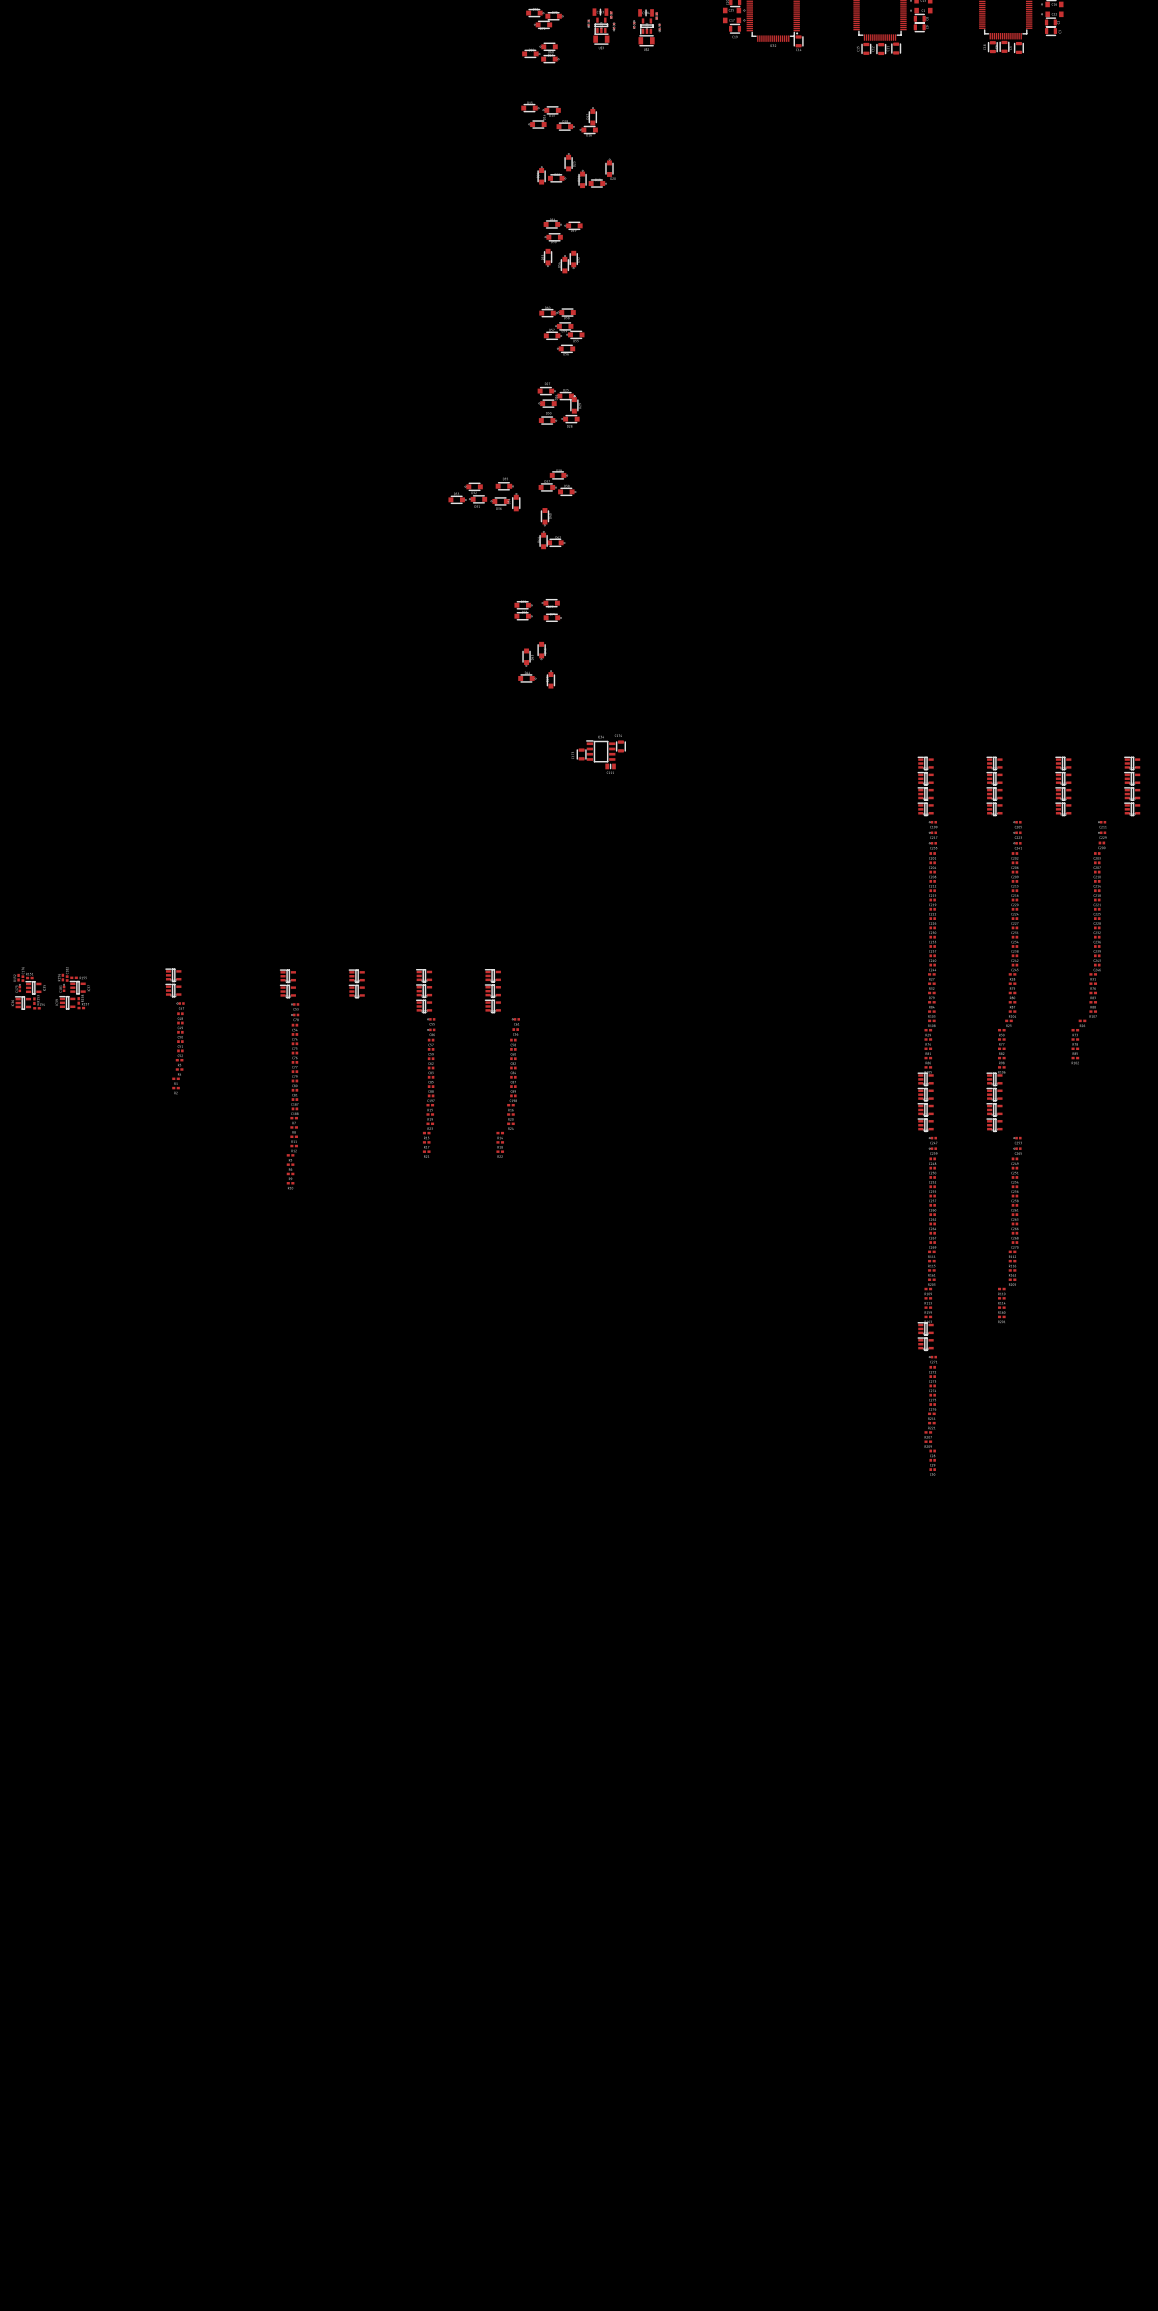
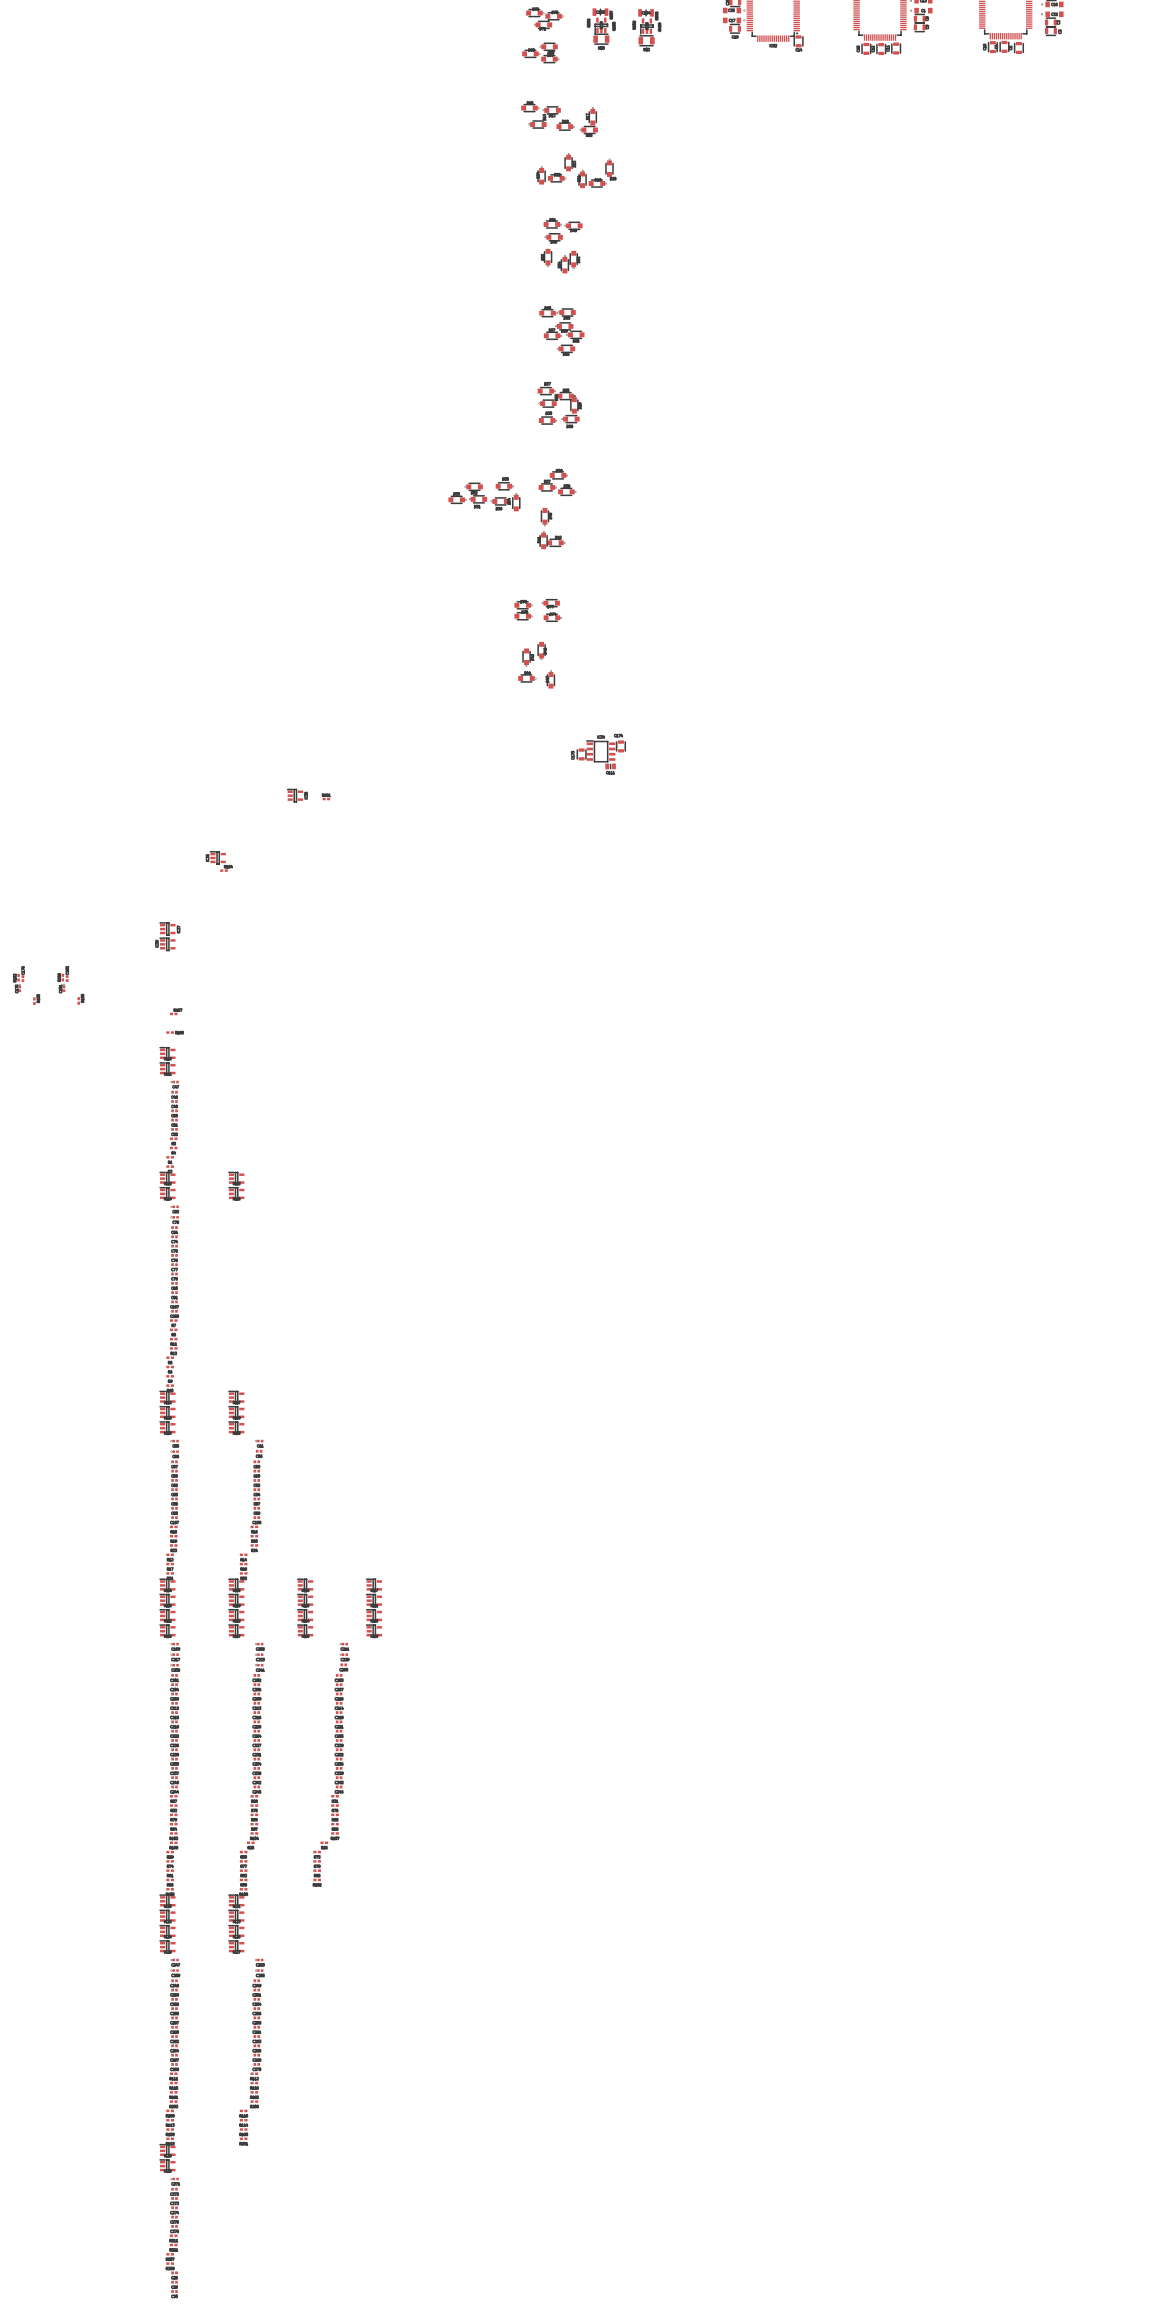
part position: (925, 763) -> (167, 1585)
part position: (994, 763) -> (236, 1585)
part position: (1063, 763) -> (305, 1585)
part position: (1132, 763) -> (374, 1585)
part position: (925, 778) -> (167, 1600)
part position: (994, 778) -> (236, 1600)
part position: (1063, 778) -> (305, 1600)
part position: (1132, 778) -> (374, 1600)
part position: (925, 794) -> (167, 1615)
part position: (994, 794) -> (236, 1615)
part position: (1063, 794) -> (305, 1615)
part position: (1132, 794) -> (374, 1615)
part position: (925, 809) -> (167, 1631)
part position: (994, 809) -> (236, 1631)
part position: (1063, 809) -> (305, 1631)
part position: (1132, 809) -> (374, 1631)
part position: (933, 822) -> (174, 1644)
part position: (1017, 822) -> (259, 1644)
part position: (1102, 822) -> (344, 1644)
part position: (933, 832) -> (174, 1654)
part position: (1017, 832) -> (259, 1654)
part position: (1102, 832) -> (344, 1654)
part position: (1101, 842) -> (343, 1664)
part position: (933, 843) -> (174, 1665)
part position: (1017, 843) -> (259, 1665)
part position: (932, 853) -> (174, 1675)
part position: (1014, 853) -> (256, 1675)
part position: (1097, 853) -> (339, 1675)
part position: (932, 862) -> (174, 1684)
part position: (1014, 862) -> (256, 1684)
part position: (1097, 862) -> (339, 1684)
part position: (932, 872) -> (174, 1693)
part position: (1014, 872) -> (256, 1693)
part position: (1097, 872) -> (339, 1693)
part position: (932, 881) -> (174, 1703)
part position: (1014, 881) -> (256, 1703)
part position: (1097, 881) -> (339, 1703)
part position: (932, 890) -> (174, 1712)
part position: (1014, 890) -> (256, 1712)
part position: (1097, 890) -> (339, 1712)
part position: (932, 899) -> (174, 1721)
part position: (1014, 899) -> (256, 1721)
part position: (1097, 899) -> (339, 1721)
part position: (932, 909) -> (174, 1731)
part position: (1014, 909) -> (256, 1731)
part position: (1097, 909) -> (339, 1731)
part position: (932, 918) -> (174, 1740)
part position: (1014, 918) -> (256, 1740)
part position: (1097, 918) -> (339, 1740)
part position: (932, 927) -> (174, 1749)
part position: (1014, 927) -> (256, 1749)
part position: (1097, 927) -> (339, 1749)
part position: (932, 937) -> (174, 1759)
part position: (1014, 937) -> (256, 1759)
part position: (1097, 937) -> (339, 1759)
part position: (932, 946) -> (174, 1768)
part position: (1014, 946) -> (256, 1768)
part position: (1097, 946) -> (339, 1768)
part position: (932, 955) -> (174, 1777)
part position: (1014, 955) -> (256, 1777)
part position: (1097, 955) -> (339, 1777)
part position: (932, 965) -> (174, 1786)
part position: (1014, 965) -> (256, 1786)
part position: (1097, 965) -> (339, 1786)
part position: (931, 974) -> (173, 1796)
part position: (1012, 974) -> (254, 1796)
part position: (1093, 974) -> (335, 1796)
part position: (173, 975) -> (167, 1053)
part position: (424, 975) -> (167, 1397)
part position: (493, 975) -> (236, 1397)
part position: (288, 976) -> (167, 1178)
part position: (356, 976) -> (236, 1178)
part position: (74, 977) -> (170, 1032)
part position: (29, 978) -> (326, 799)
part position: (931, 983) -> (173, 1805)
part position: (1012, 983) -> (254, 1805)
part position: (1093, 983) -> (335, 1805)
part position: (33, 987) -> (295, 795)
part position: (77, 987) -> (167, 929)
part position: (173, 990) -> (167, 1069)
part position: (288, 991) -> (167, 1193)
part position: (356, 991) -> (236, 1193)
part position: (424, 991) -> (167, 1412)
part position: (493, 991) -> (236, 1412)
part position: (931, 992) -> (173, 1814)
part position: (1012, 992) -> (254, 1814)
part position: (1093, 992) -> (335, 1814)
part position: (67, 1002) -> (167, 944)
part position: (931, 1002) -> (173, 1824)
part position: (1012, 1002) -> (254, 1824)
part position: (1093, 1002) -> (335, 1824)
part position: (23, 1003) -> (217, 858)
part position: (180, 1003) -> (174, 1082)
part position: (295, 1004) -> (174, 1206)
part position: (424, 1006) -> (167, 1428)
part position: (493, 1006) -> (236, 1428)
part position: (36, 1008) -> (224, 870)
part position: (81, 1008) -> (173, 1013)
part position: (931, 1011) -> (173, 1833)
part position: (1012, 1011) -> (254, 1833)
part position: (1093, 1011) -> (335, 1833)
part position: (180, 1013) -> (174, 1092)
part position: (295, 1014) -> (174, 1217)
part position: (431, 1019) -> (174, 1441)
part position: (516, 1019) -> (259, 1441)
part position: (931, 1020) -> (173, 1842)
part position: (1008, 1020) -> (250, 1842)
part position: (1082, 1020) -> (324, 1842)
part position: (180, 1023) -> (174, 1101)
part position: (294, 1025) -> (174, 1227)
part position: (431, 1029) -> (174, 1451)
part position: (515, 1029) -> (259, 1451)
part position: (928, 1030) -> (170, 1852)
part position: (1001, 1030) -> (243, 1852)
part position: (1075, 1030) -> (317, 1852)
part position: (180, 1032) -> (174, 1110)
part position: (294, 1034) -> (174, 1236)
part position: (928, 1039) -> (170, 1861)
part position: (1001, 1039) -> (243, 1861)
part position: (1075, 1039) -> (317, 1861)
part position: (431, 1040) -> (174, 1461)
part position: (513, 1040) -> (256, 1461)
part position: (180, 1041) -> (174, 1120)
part position: (294, 1043) -> (174, 1246)
part position: (928, 1048) -> (170, 1870)
part position: (1001, 1048) -> (243, 1870)
part position: (1075, 1048) -> (317, 1870)
part position: (431, 1049) -> (174, 1471)
part position: (513, 1049) -> (256, 1471)
part position: (180, 1050) -> (174, 1129)
part position: (294, 1053) -> (174, 1255)
part position: (431, 1058) -> (174, 1480)
part position: (513, 1058) -> (256, 1480)
part position: (928, 1058) -> (170, 1879)
part position: (1001, 1058) -> (243, 1879)
part position: (1075, 1058) -> (317, 1879)
part position: (179, 1060) -> (173, 1138)
part position: (294, 1062) -> (174, 1264)
part position: (431, 1067) -> (174, 1489)
part position: (513, 1067) -> (256, 1489)
part position: (928, 1067) -> (170, 1889)
part position: (1001, 1067) -> (243, 1889)
part position: (179, 1069) -> (173, 1148)
part position: (294, 1071) -> (174, 1274)
part position: (431, 1077) -> (174, 1499)
part position: (513, 1077) -> (256, 1499)
part position: (176, 1078) -> (170, 1157)
part position: (925, 1079) -> (167, 1901)
part position: (994, 1079) -> (236, 1901)
part position: (294, 1080) -> (174, 1283)
part position: (431, 1086) -> (174, 1508)
part position: (513, 1086) -> (256, 1508)
part position: (176, 1088) -> (170, 1166)
part position: (294, 1090) -> (174, 1292)
part position: (925, 1094) -> (167, 1916)
part position: (994, 1094) -> (236, 1916)
part position: (431, 1095) -> (174, 1517)
part position: (513, 1095) -> (256, 1517)
part position: (294, 1099) -> (174, 1301)
part position: (430, 1105) -> (173, 1526)
part position: (510, 1105) -> (254, 1526)
part position: (294, 1108) -> (174, 1311)
part position: (925, 1109) -> (167, 1931)
part position: (994, 1109) -> (236, 1931)
part position: (430, 1114) -> (173, 1536)
part position: (510, 1114) -> (254, 1536)
part position: (294, 1118) -> (173, 1320)
part position: (430, 1123) -> (173, 1545)
part position: (510, 1123) -> (254, 1545)
part position: (925, 1125) -> (167, 1947)
part position: (994, 1125) -> (236, 1947)
part position: (294, 1127) -> (173, 1329)
part position: (426, 1133) -> (170, 1554)
part position: (500, 1133) -> (243, 1554)
part position: (294, 1136) -> (173, 1339)
part position: (933, 1138) -> (174, 1960)
part position: (1017, 1138) -> (259, 1960)
part position: (426, 1142) -> (170, 1564)
part position: (500, 1142) -> (243, 1564)
part position: (294, 1146) -> (173, 1348)
part position: (933, 1148) -> (174, 1970)
part position: (1017, 1148) -> (259, 1970)
part position: (426, 1151) -> (170, 1573)
part position: (500, 1151) -> (243, 1573)
part position: (290, 1155) -> (170, 1357)
part position: (932, 1158) -> (174, 1980)
part position: (1014, 1158) -> (256, 1980)
part position: (290, 1164) -> (170, 1367)
part position: (932, 1168) -> (174, 1990)
part position: (1014, 1168) -> (256, 1990)
part position: (290, 1173) -> (170, 1376)
part position: (932, 1177) -> (174, 1999)
part position: (1014, 1177) -> (256, 1999)
part position: (290, 1183) -> (170, 1385)
part position: (932, 1186) -> (174, 2008)
part position: (1014, 1186) -> (256, 2008)
part position: (932, 1196) -> (174, 2017)
part position: (1014, 1196) -> (256, 2017)
part position: (932, 1205) -> (174, 2027)
part position: (1014, 1205) -> (256, 2027)
part position: (932, 1214) -> (174, 2036)
part position: (1014, 1214) -> (256, 2036)
part position: (932, 1223) -> (174, 2045)
part position: (1014, 1223) -> (256, 2045)
part position: (932, 1233) -> (174, 2055)
part position: (1014, 1233) -> (256, 2055)
part position: (932, 1242) -> (174, 2064)
part position: (1014, 1242) -> (256, 2064)
part position: (931, 1251) -> (173, 2073)
part position: (1012, 1251) -> (254, 2073)
part position: (931, 1261) -> (173, 2083)
part position: (1012, 1261) -> (254, 2083)
part position: (931, 1270) -> (173, 2092)
part position: (1012, 1270) -> (254, 2092)
part position: (931, 1279) -> (173, 2101)
part position: (1012, 1279) -> (254, 2101)
part position: (928, 1289) -> (170, 2110)
part position: (1001, 1289) -> (243, 2110)
part position: (928, 1298) -> (170, 2120)
part position: (1001, 1298) -> (243, 2120)
part position: (928, 1307) -> (170, 2129)
part position: (1001, 1307) -> (243, 2129)
part position: (928, 1316) -> (170, 2138)
part position: (1001, 1316) -> (243, 2138)
part position: (925, 1328) -> (167, 2150)
part position: (925, 1344) -> (167, 2166)
part position: (933, 1357) -> (174, 2179)
part position: (932, 1367) -> (174, 2189)
part position: (932, 1376) -> (174, 2198)
part position: (932, 1385) -> (174, 2207)
part position: (932, 1395) -> (174, 2217)
part position: (932, 1404) -> (174, 2226)
part position: (931, 1413) -> (173, 2235)
part position: (931, 1423) -> (173, 2245)
part position: (928, 1432) -> (170, 2254)
part position: (928, 1441) -> (170, 2263)
part position: (932, 1451) -> (174, 2272)
part position: (932, 1460) -> (174, 2282)
part position: (932, 1469) -> (174, 2291)

